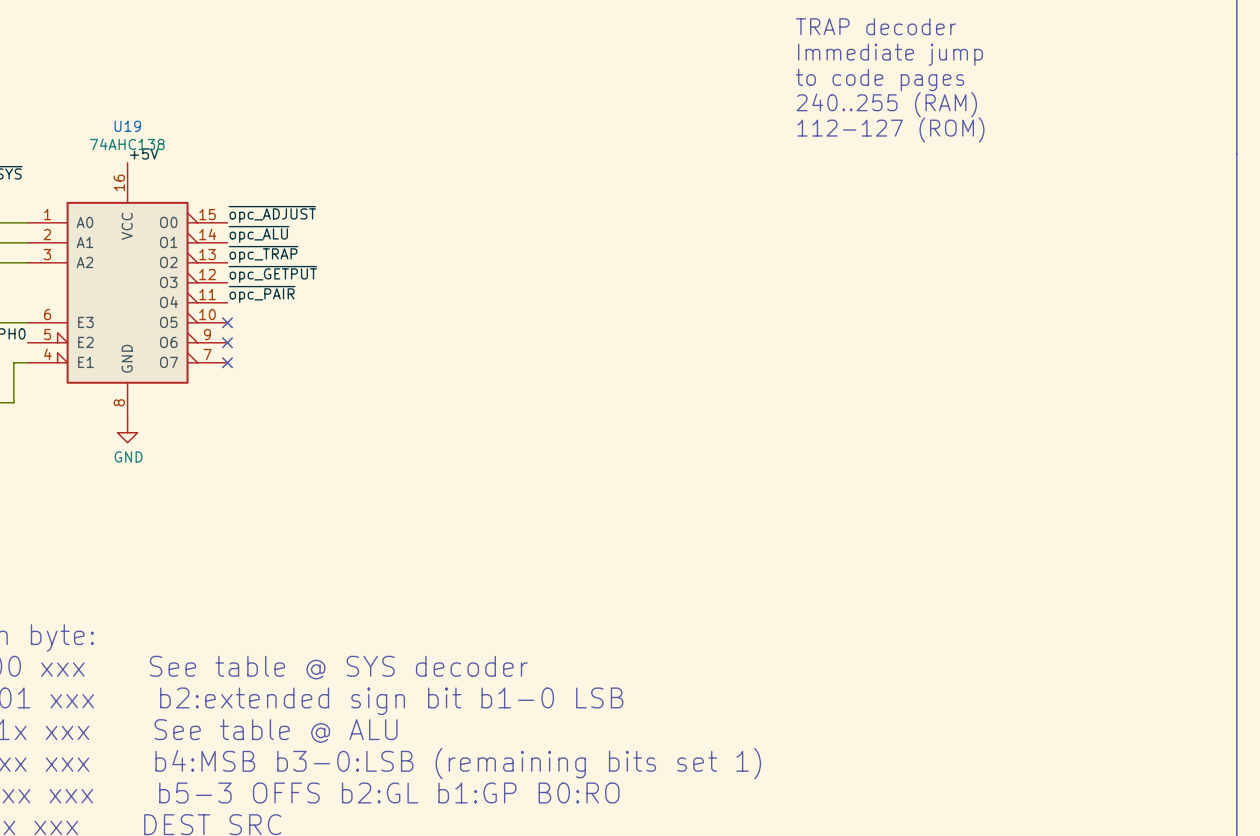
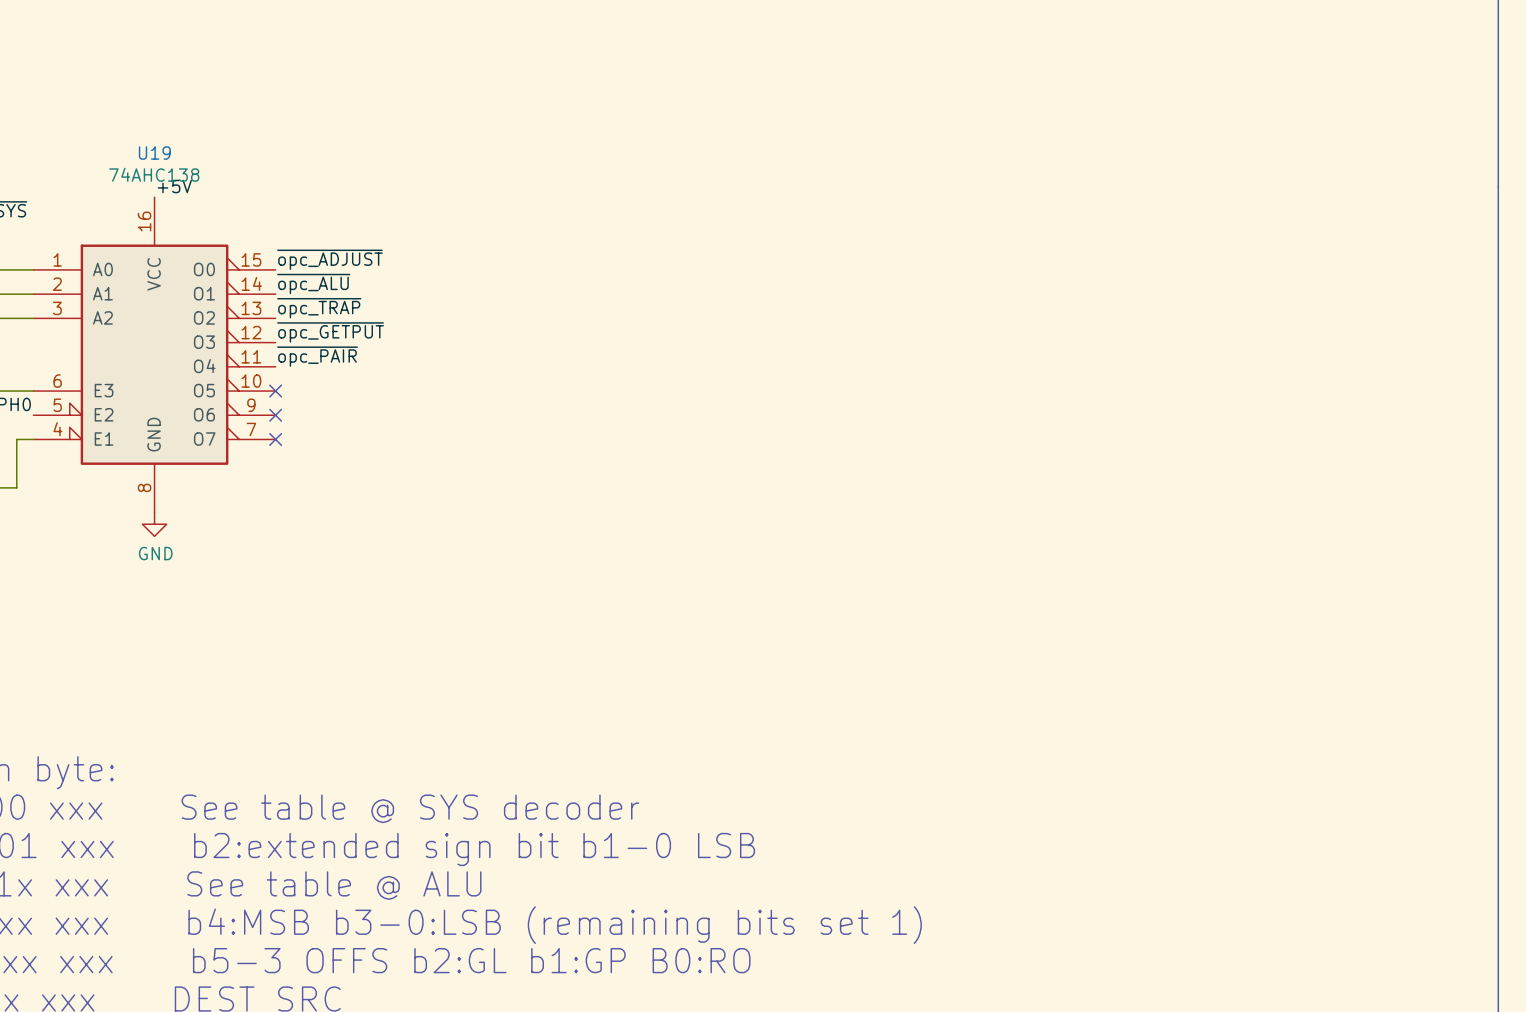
text: TRAP decoder (875, 26) -> none
text: Immediate jump (890, 54) -> none
text: to code pages (880, 80) -> none
text: 240..255 (RAM) (886, 104) -> none
text: 112-127 (ROM) (890, 129) -> none

